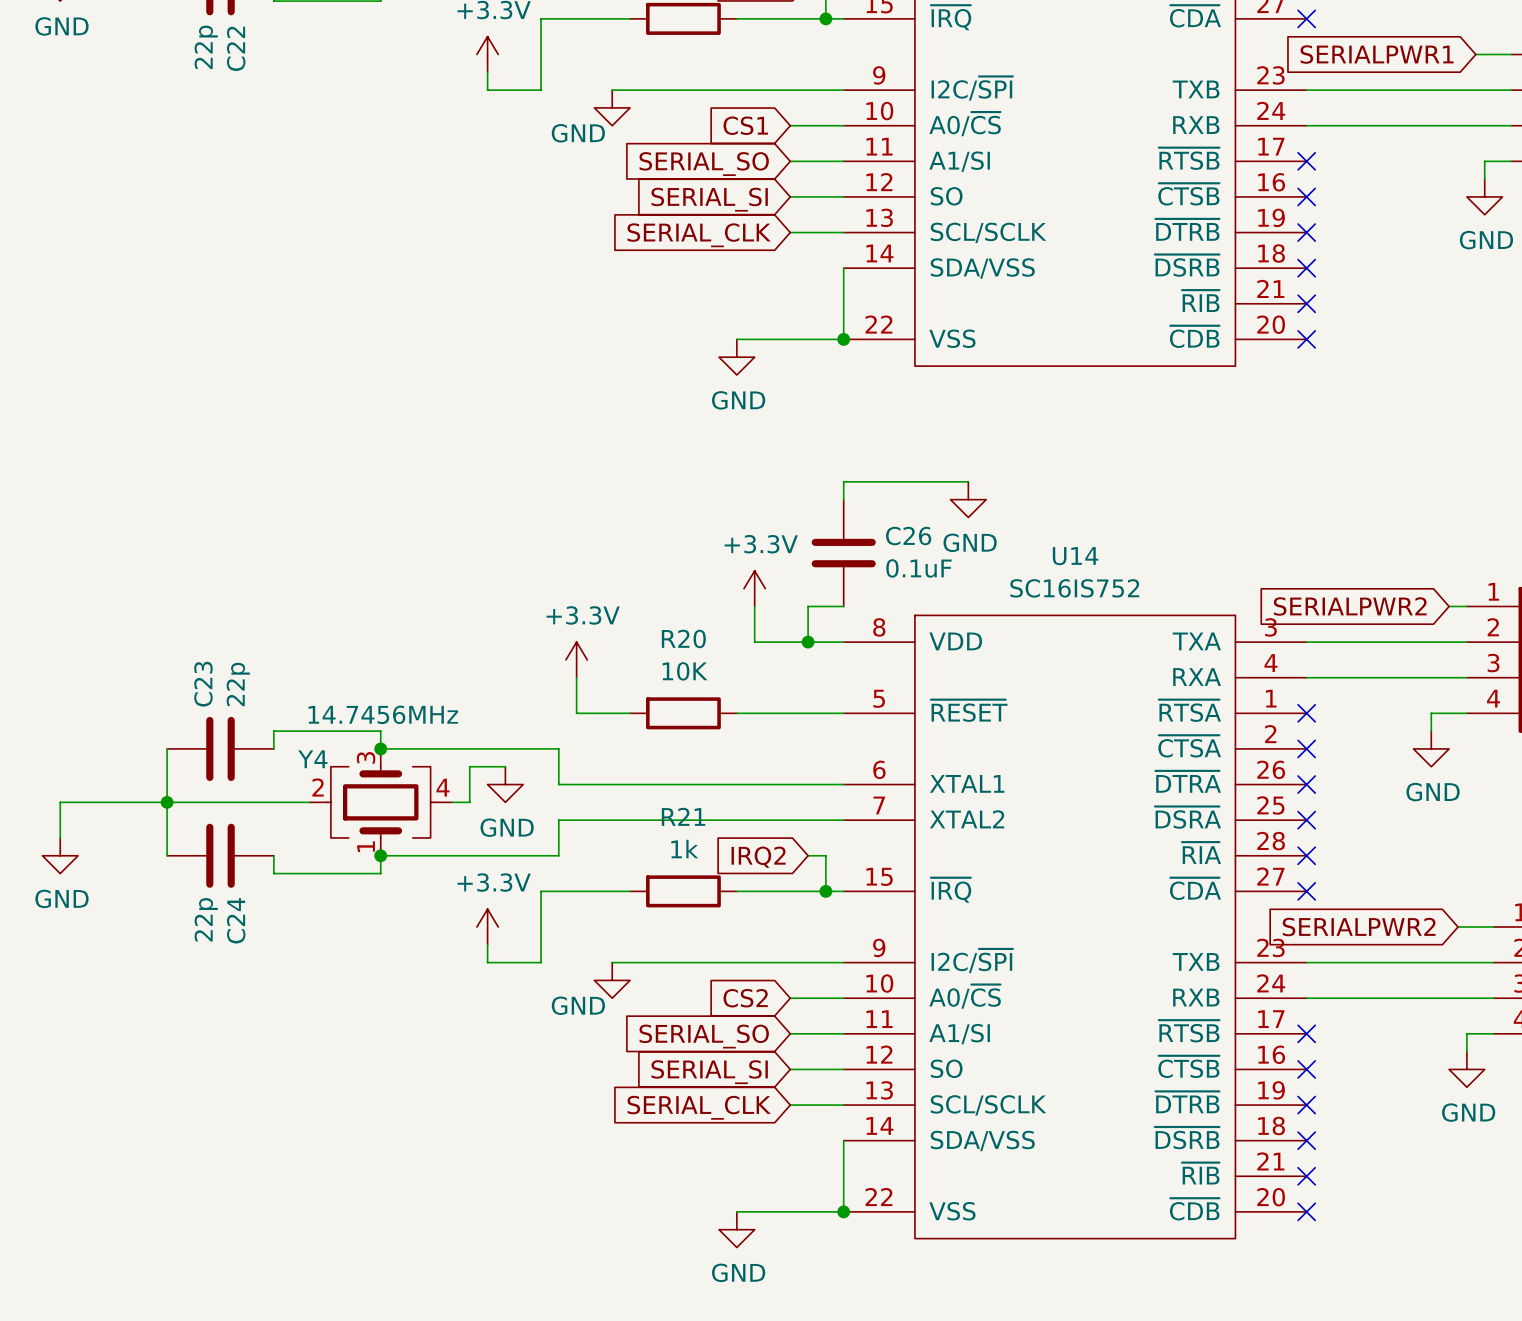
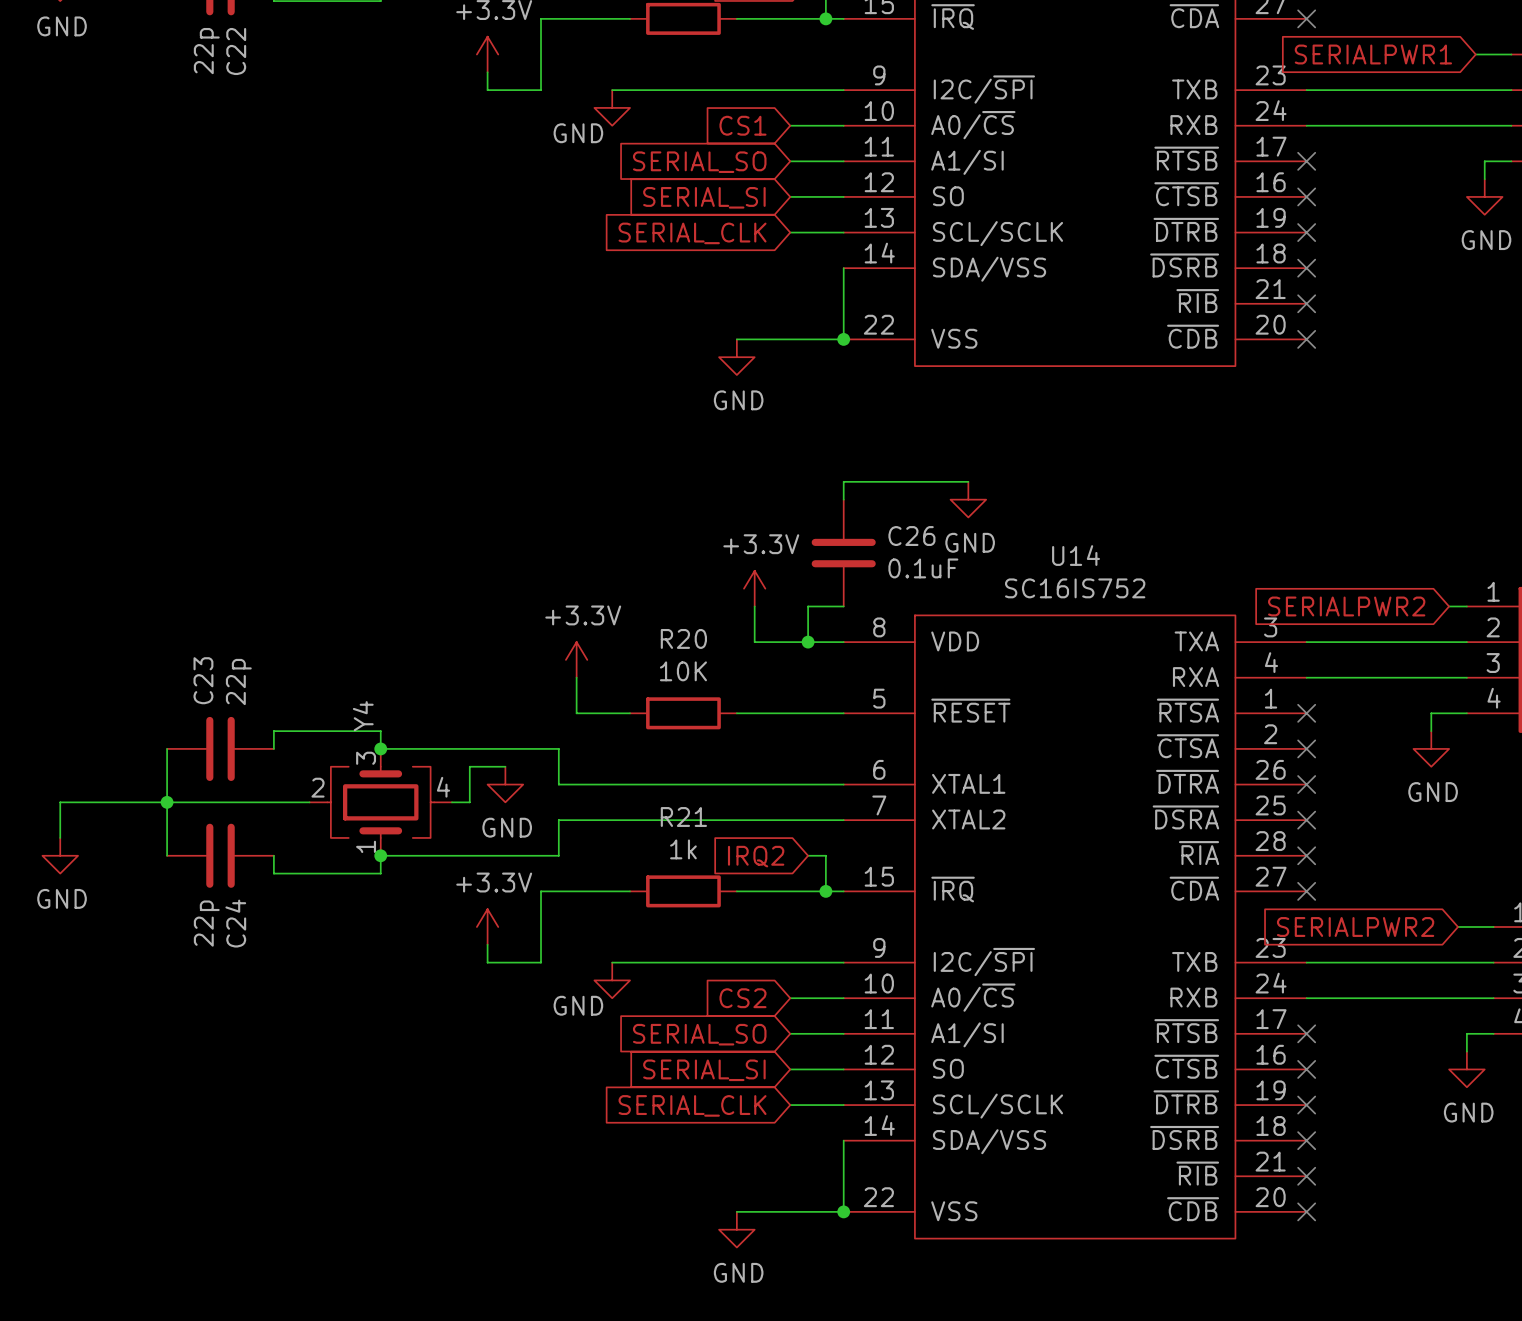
Y4 value: 14.7456MHz (383, 714) -> none
Y4 name rotation: 0° (312, 759) -> 90° counterclockwise (363, 716)
Y4 name position: Y4 (312, 759) -> Y4 (363, 716)

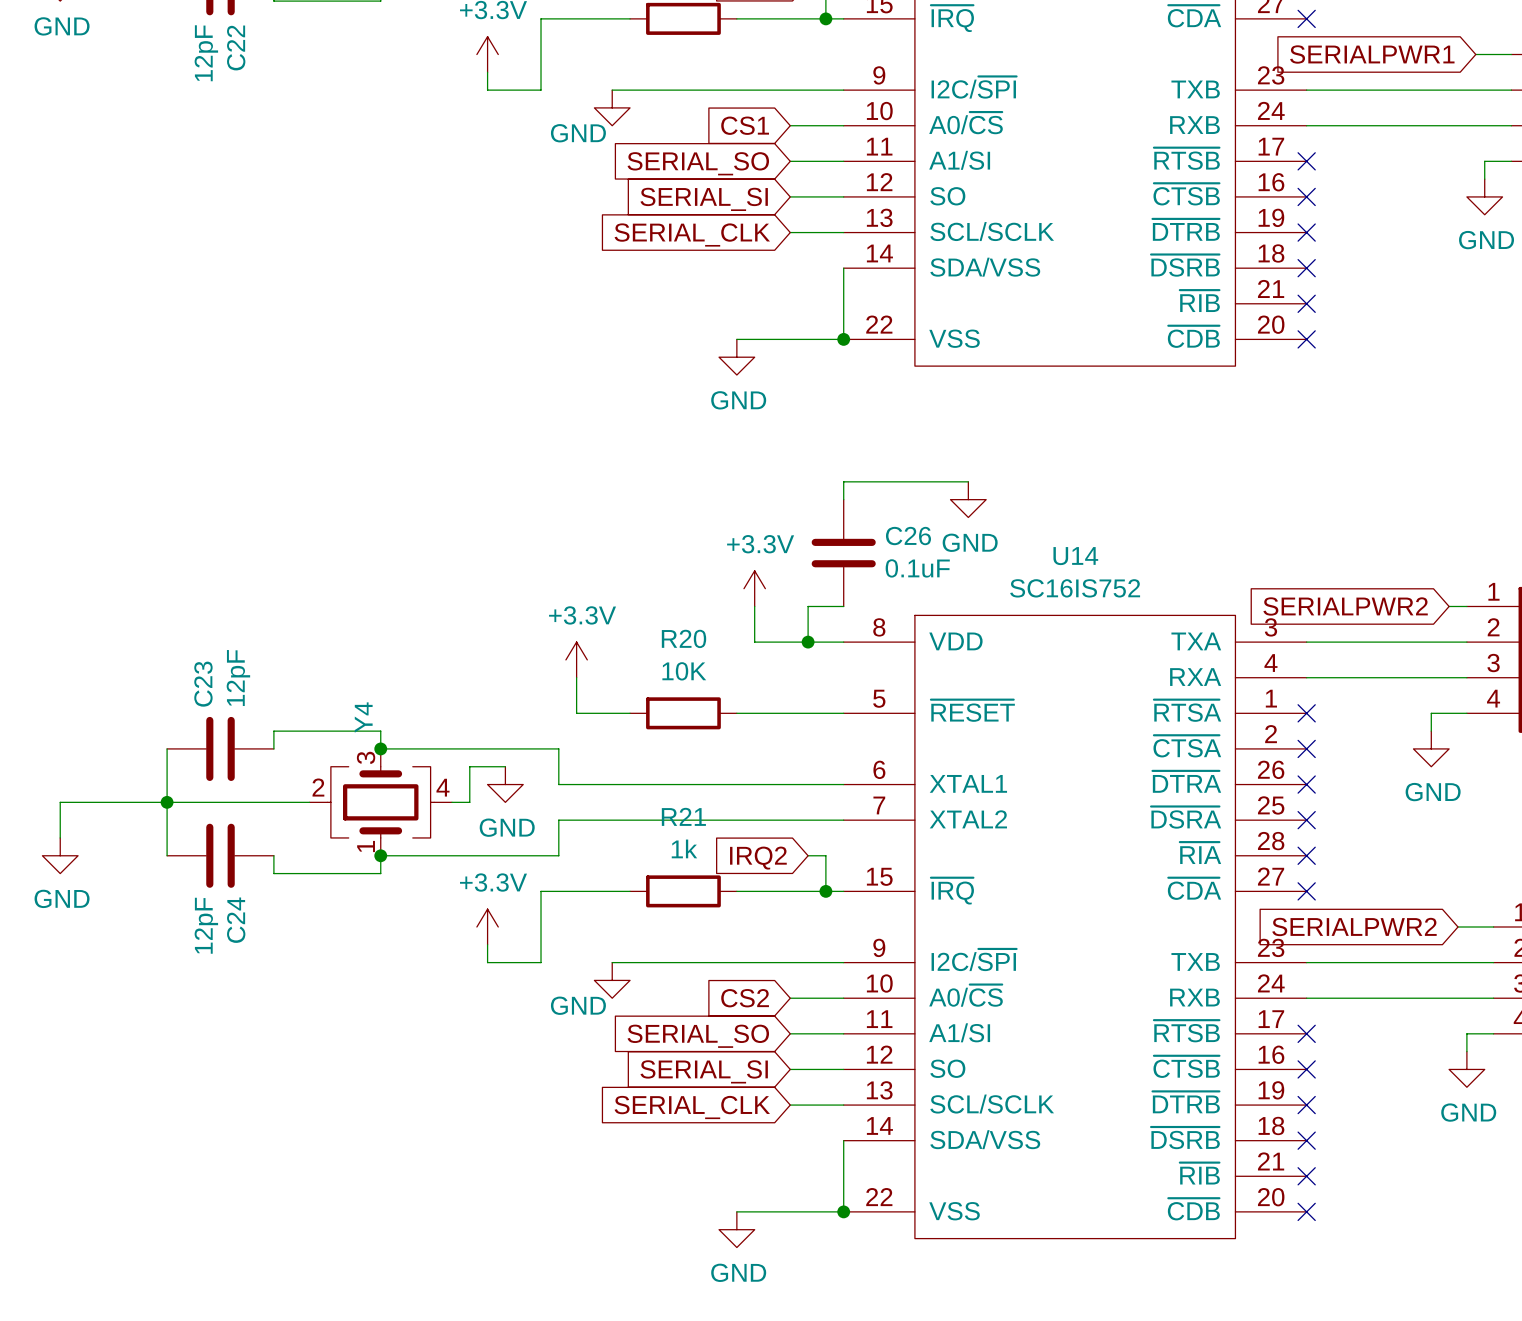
C22 value: 22p (206, 51) -> 12pF (206, 53)
C23 value: 22p (238, 681) -> 12pF (238, 678)
C24 value: 22p (206, 923) -> 12pF (206, 925)

